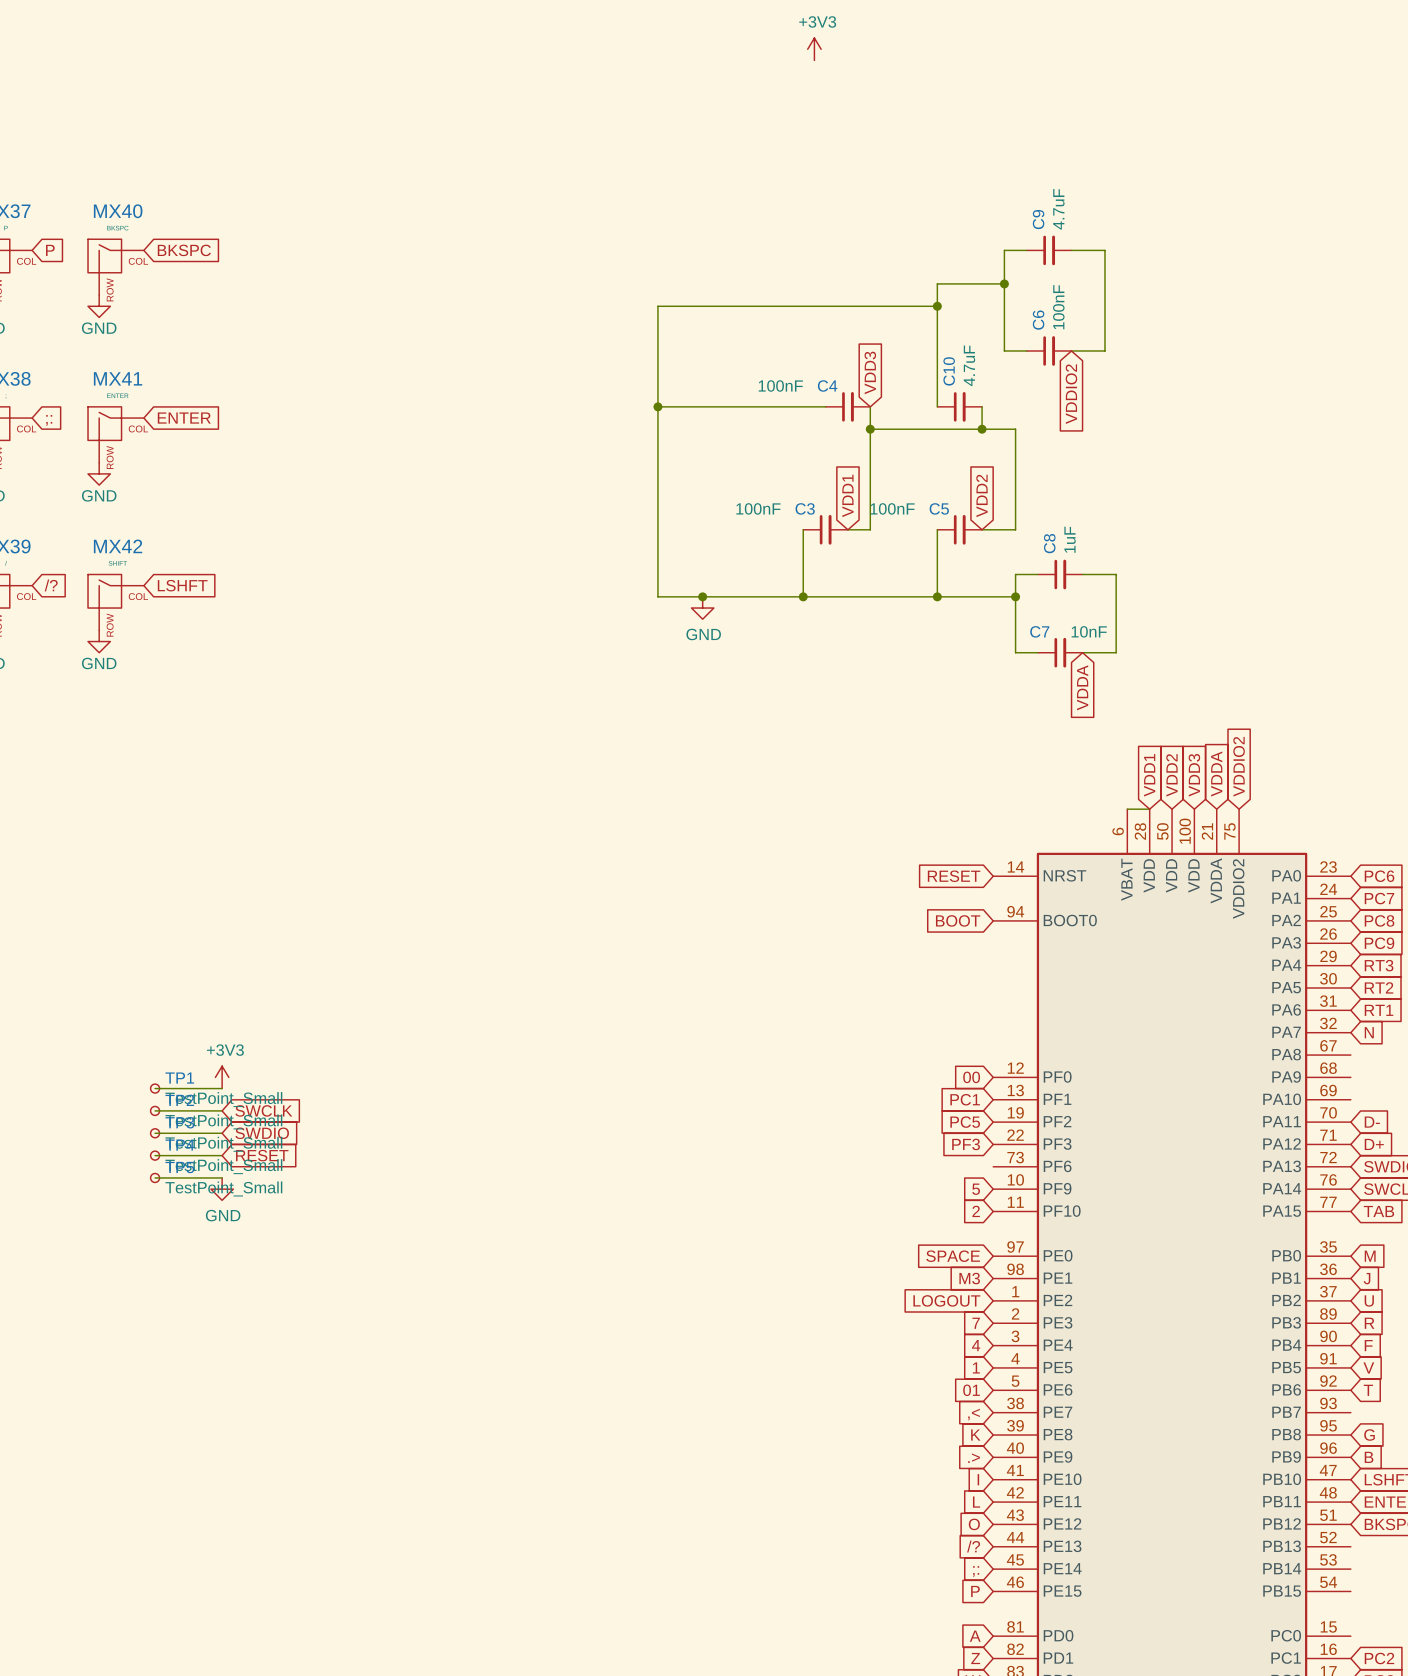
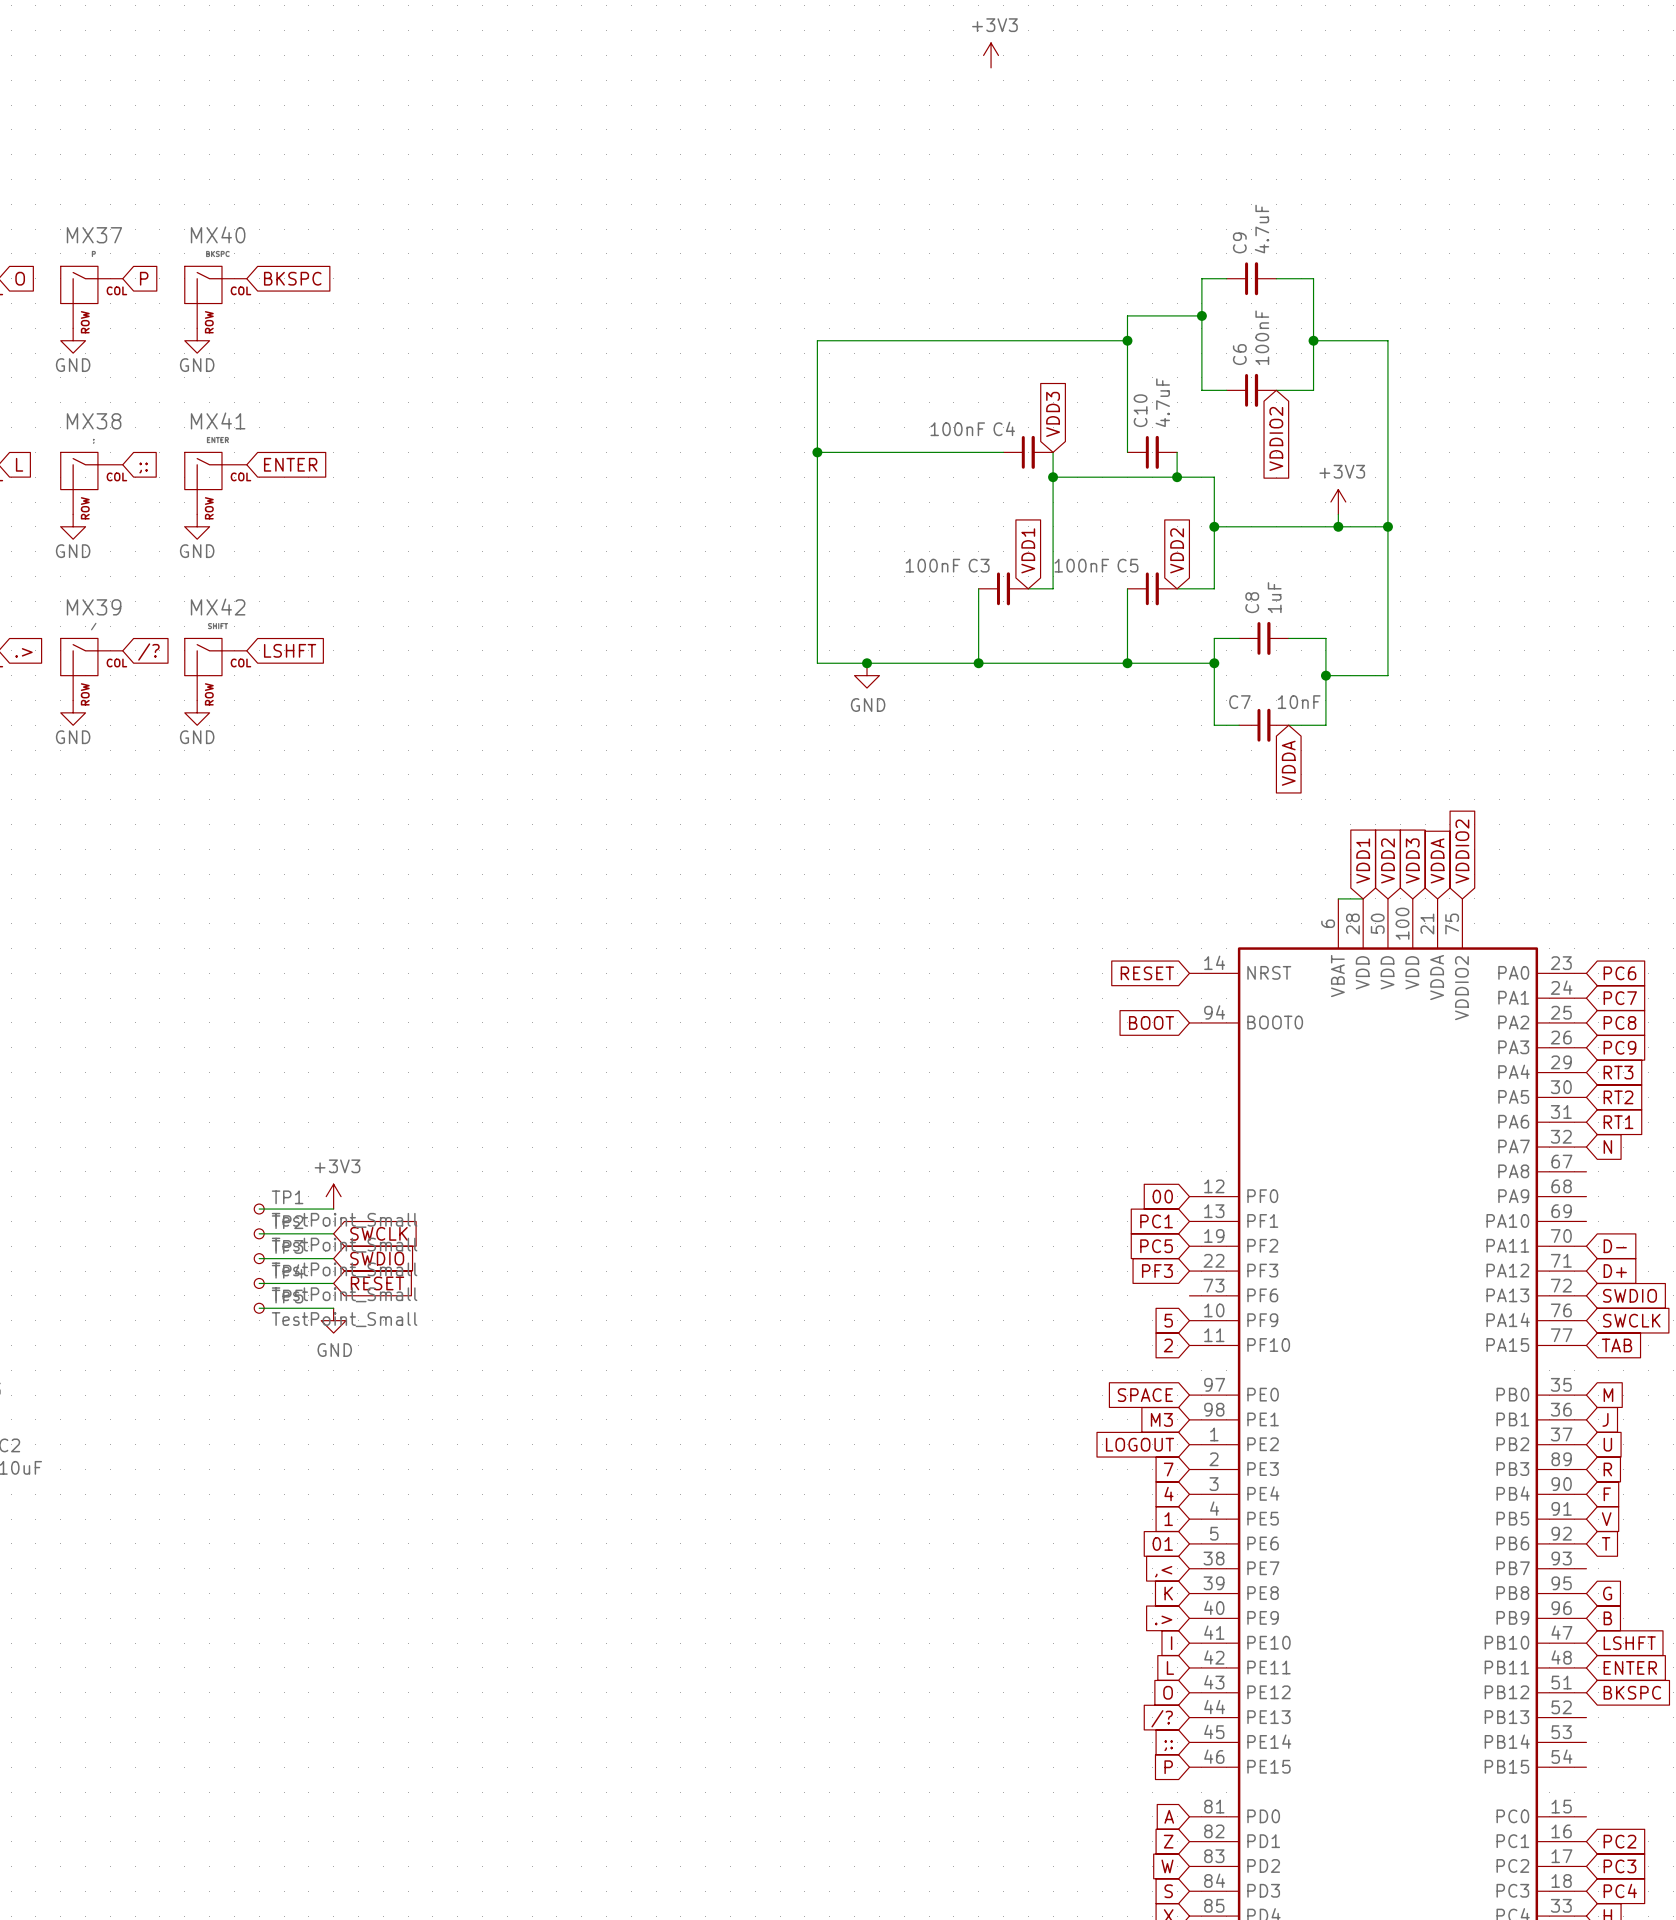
wire: none -> (1313, 340) (1387, 340) (1387, 675) (1325, 675)
junction: none -> (1313, 340)
power symbol: none -> +3V3 (1338, 502)
wire: none -> (1338, 514) (1338, 526)
wire: none -> (1214, 526) (1387, 526)
junction: none -> (1214, 526)
junction: none -> (1338, 526)
junction: none -> (1387, 526)
junction: none -> (1325, 675)

